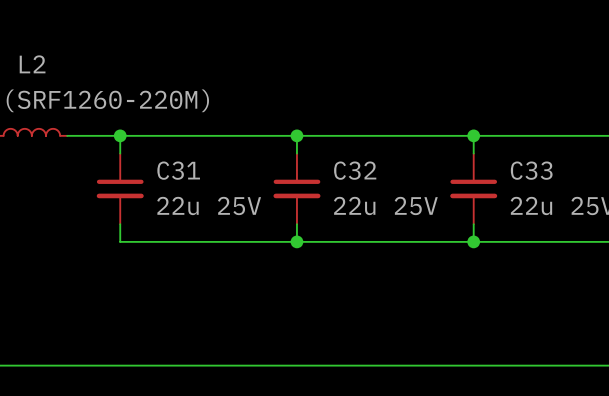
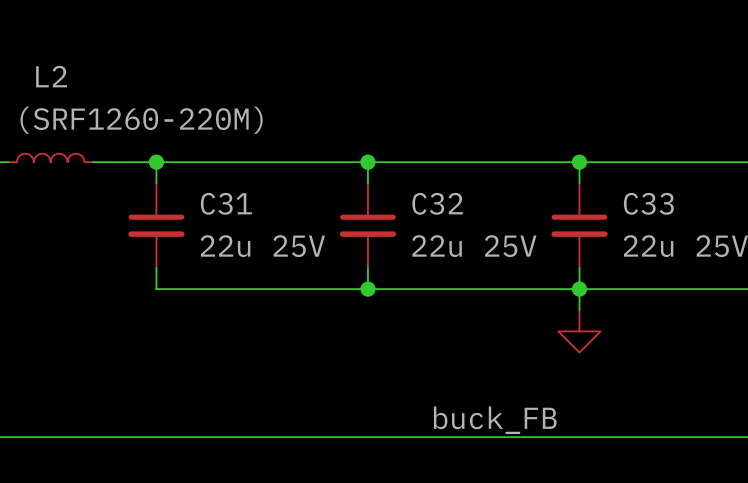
wire: none -> (579, 289) (579, 310)
power symbol: none -> (579, 331)
label: none -> buck_FB (495, 420)

